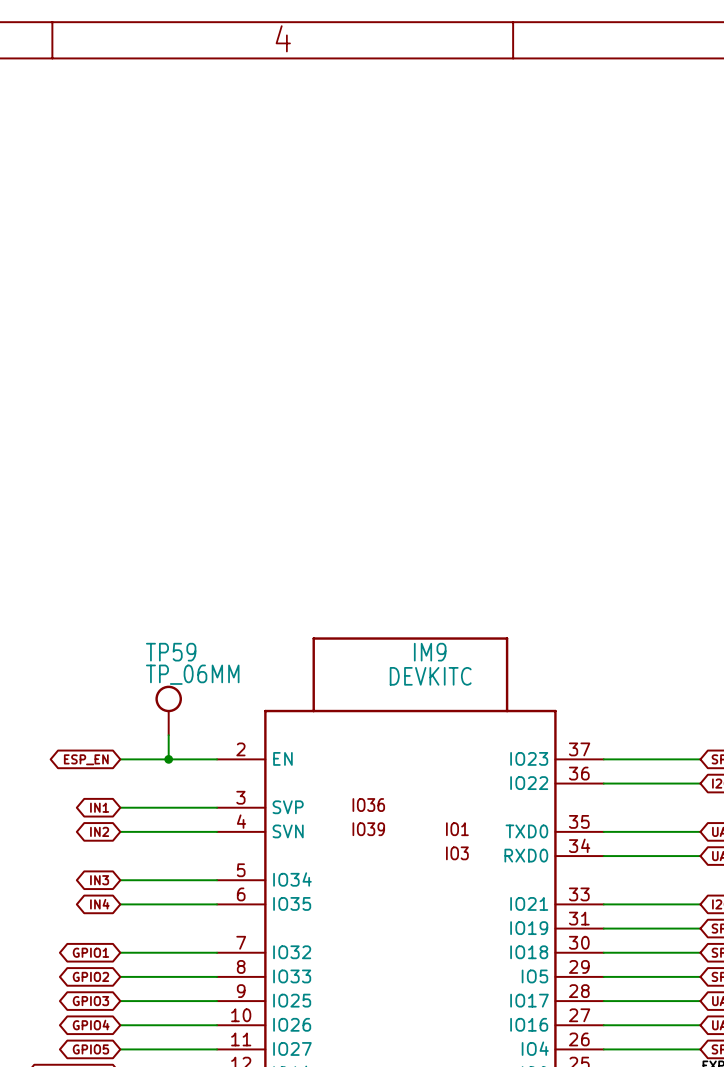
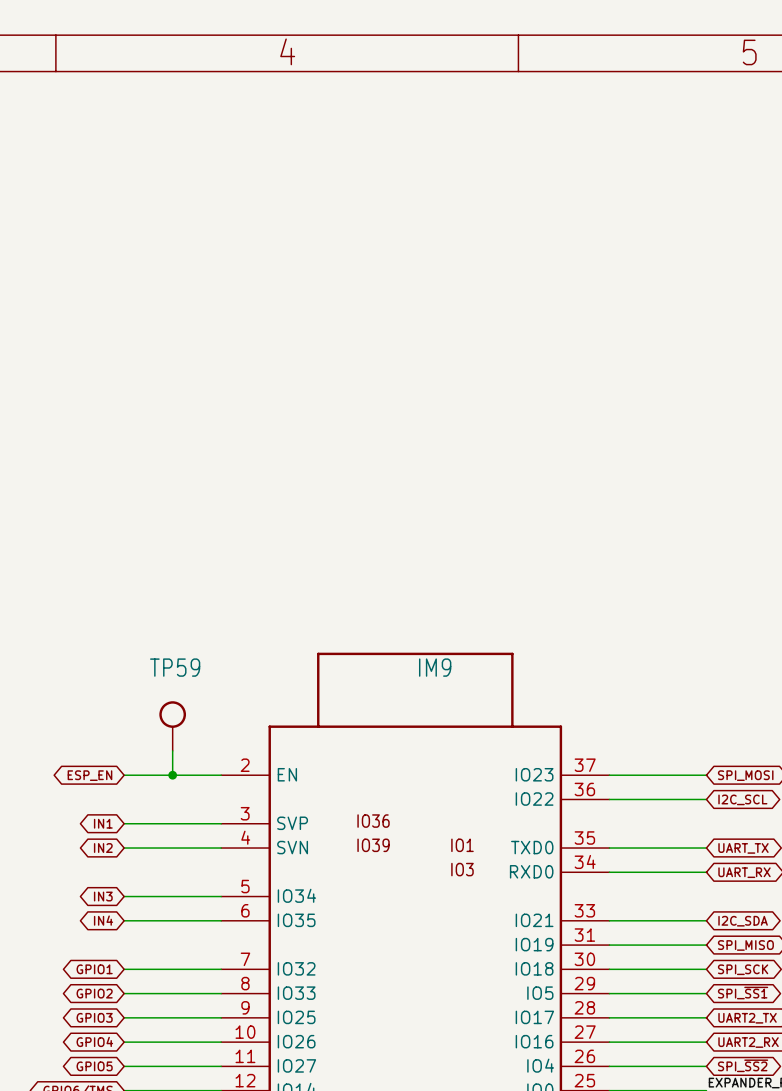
TP59 value: TP_06MM (192, 674) -> none
IM9 value: DEVKITC (430, 676) -> none

